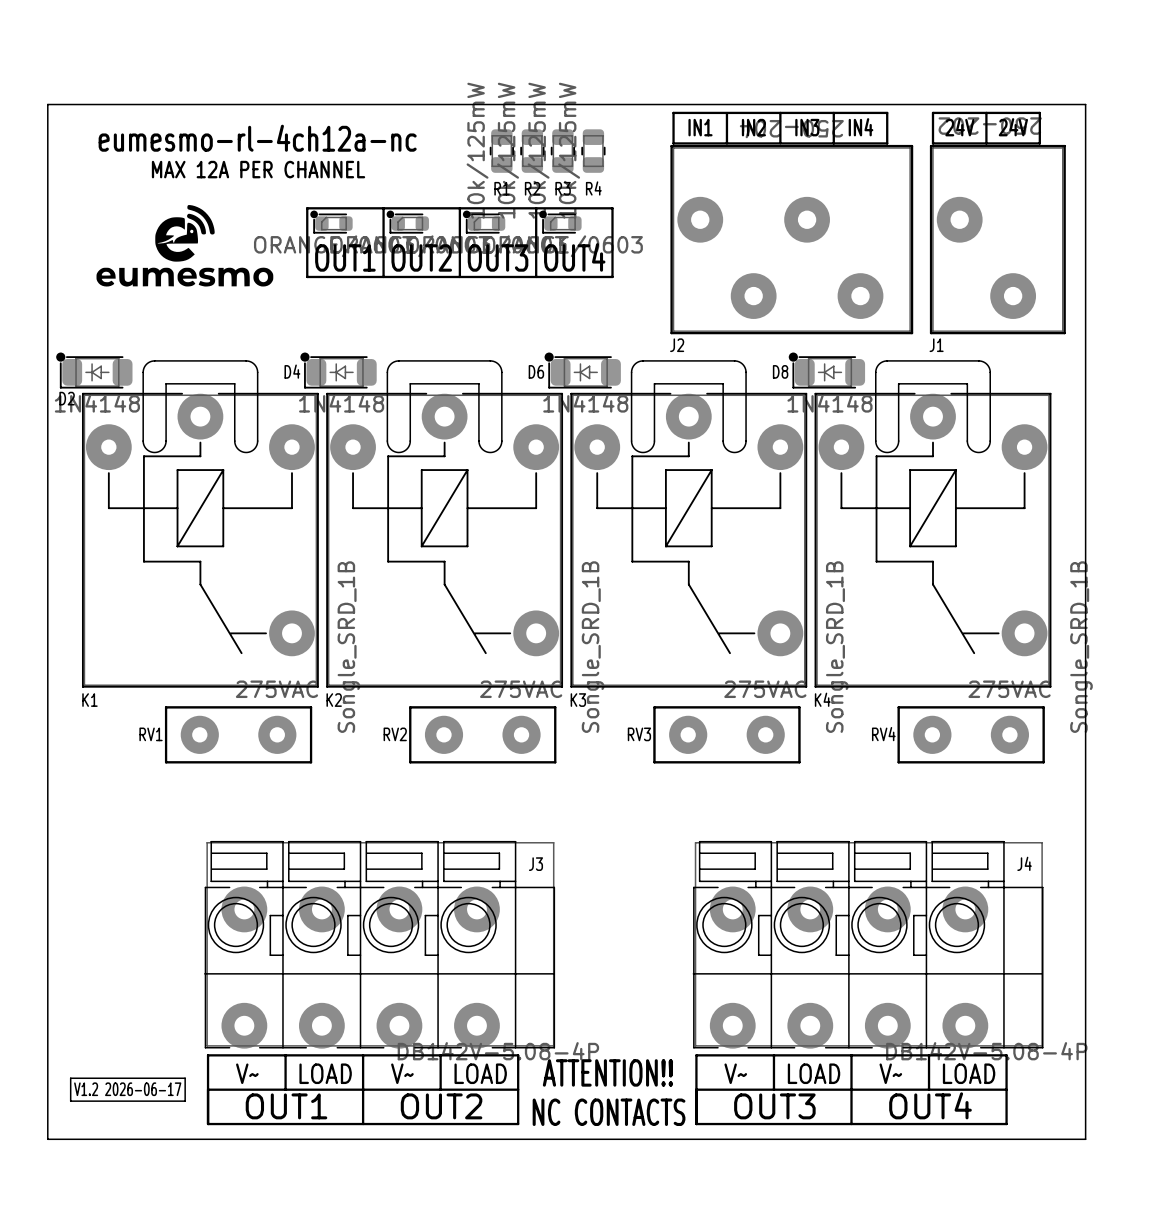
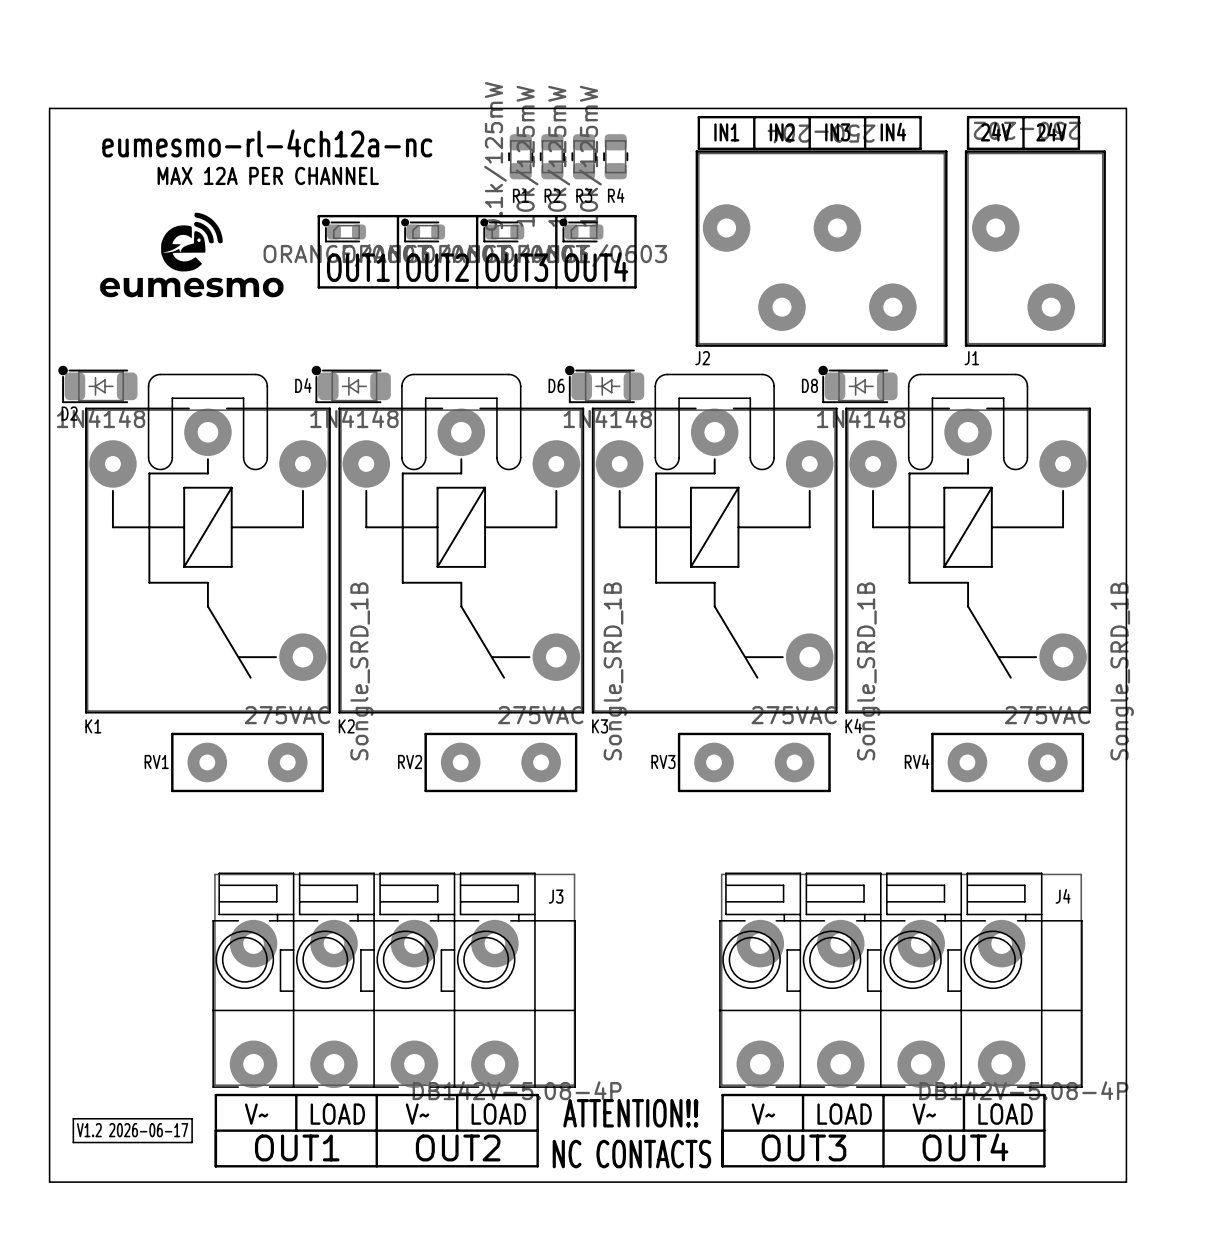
R1 value: 10k/125mW (477, 150) -> 9.1k/125mW (495, 156)

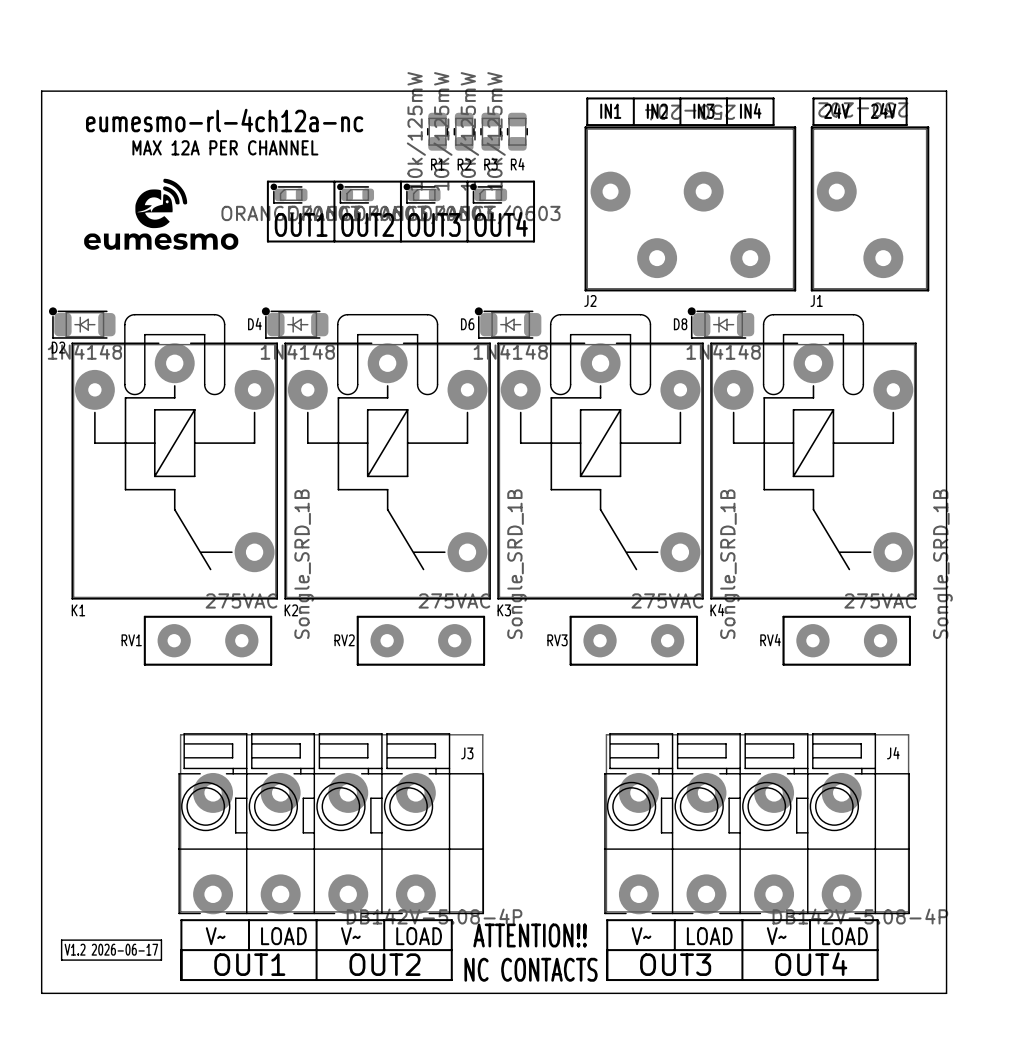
R1 value: 9.1k/125mW (495, 156) -> 10k/125mW (416, 131)

